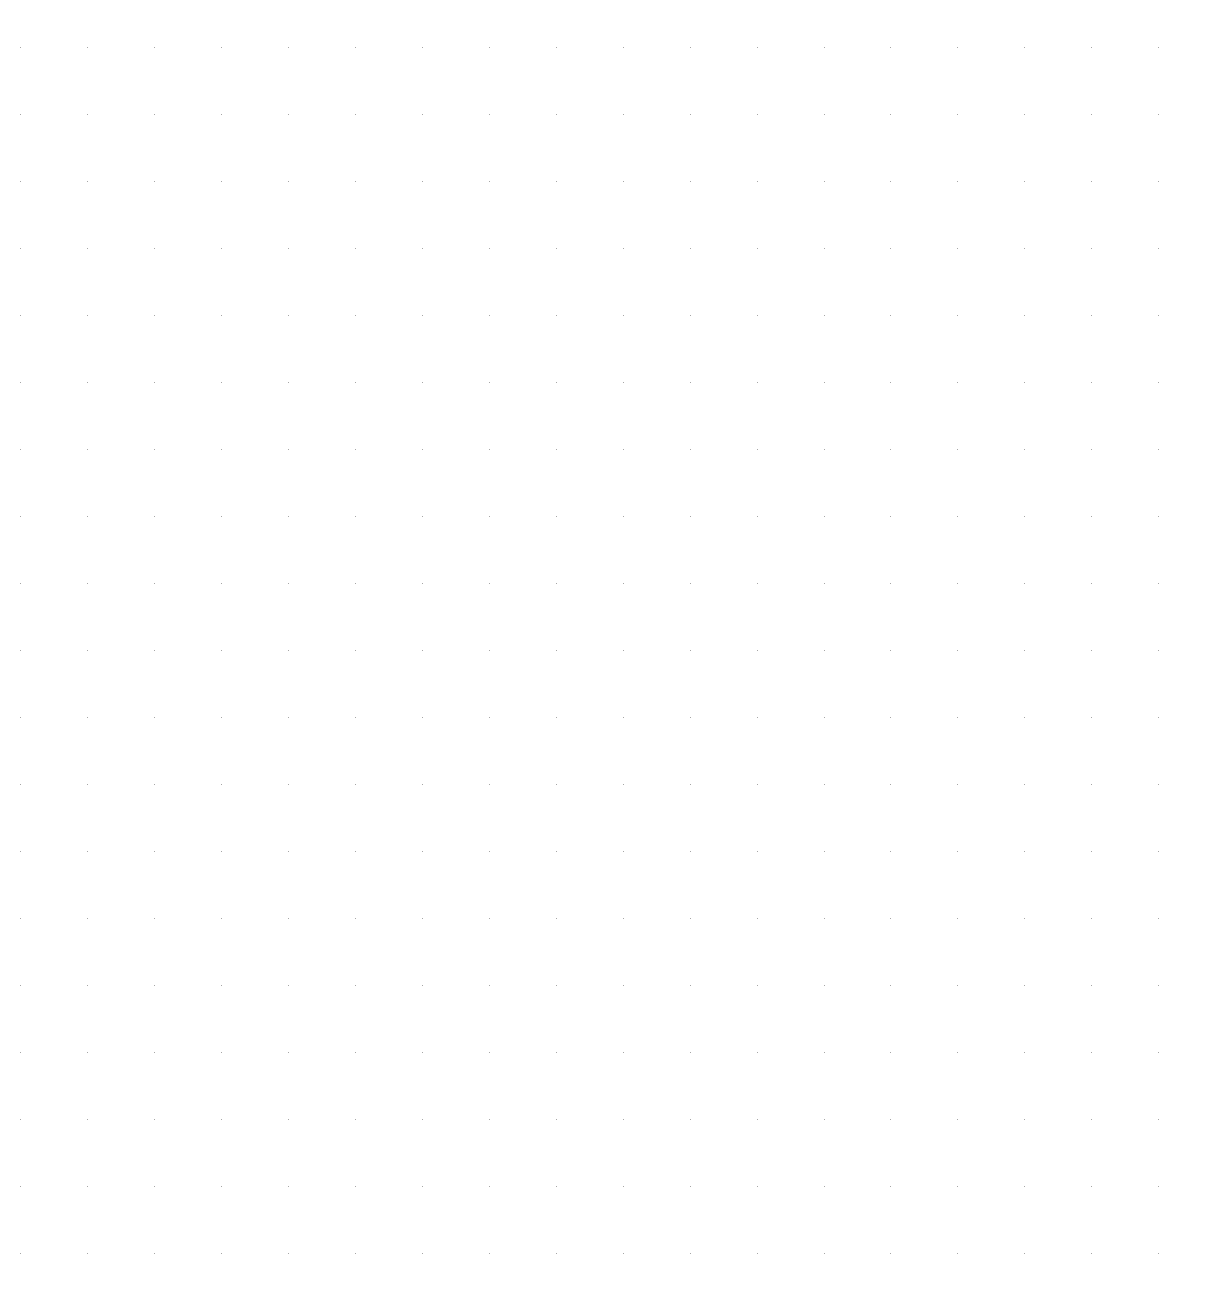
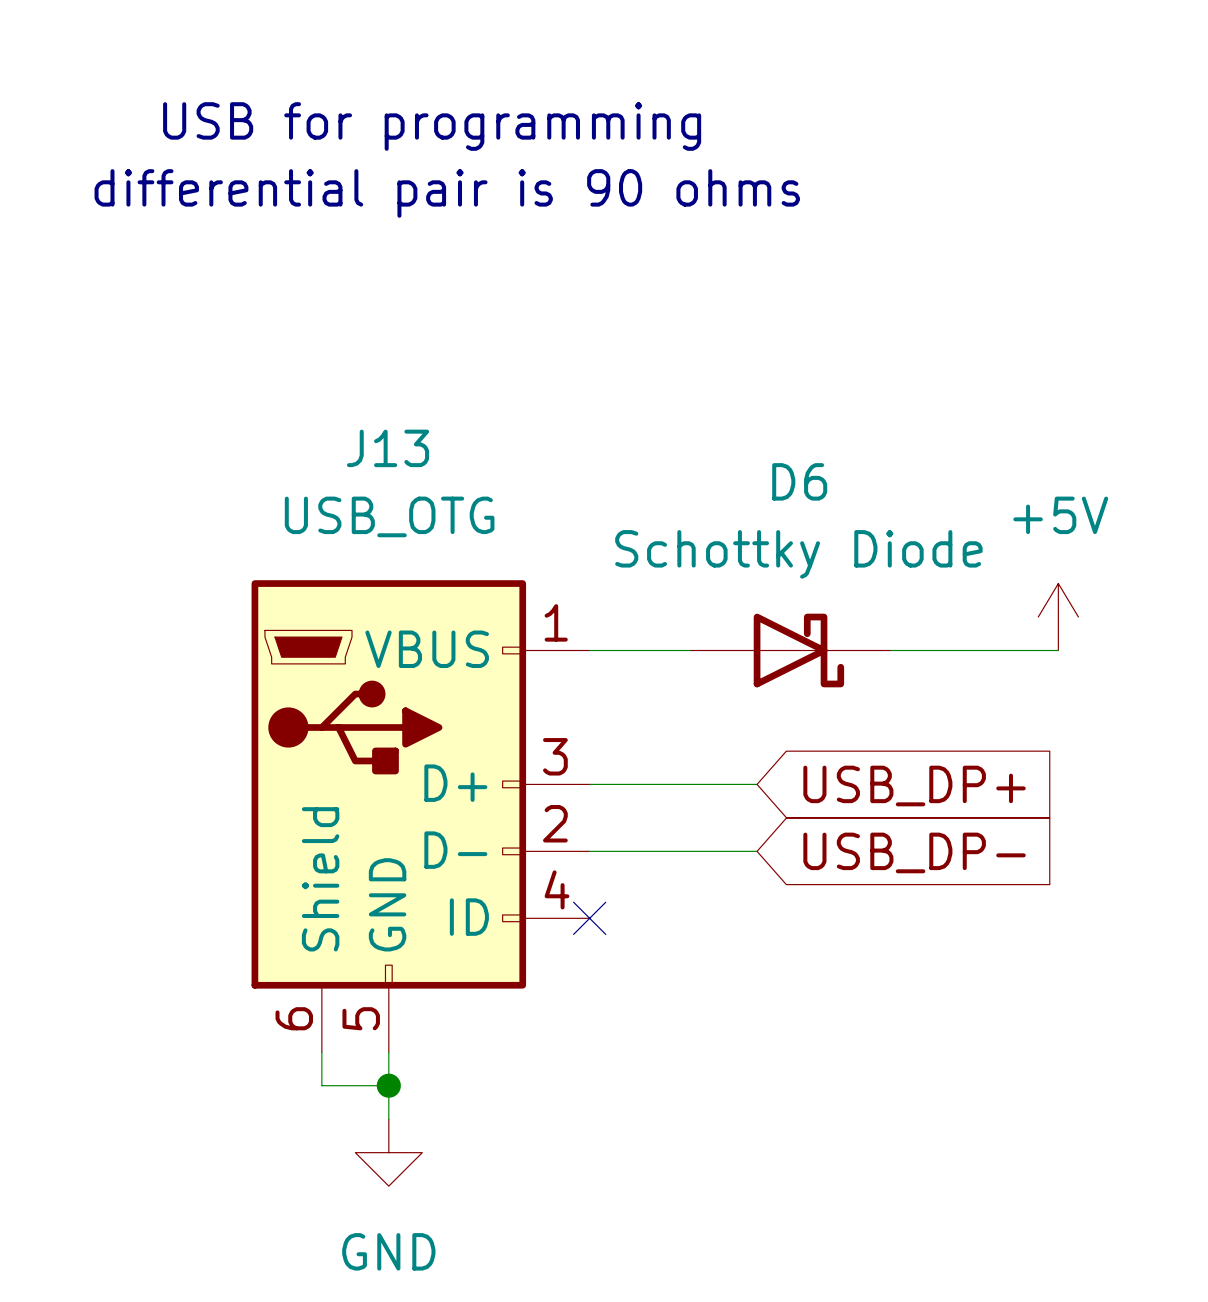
text: none -> USB for programming (432, 126)
text: none -> differential pair is 90 ohms (447, 193)
power symbol: none -> +5V (1058, 617)
wire: none -> (589, 650) (690, 650)
D6: none -> Schottky Diode (790, 650)
wire: none -> (890, 650) (1058, 650)
wire: none -> (589, 784) (757, 784)
global label: none -> USB_DP+ (914, 786)
J13: none -> USB_OTG (420, 816)
wire: none -> (589, 851) (757, 851)
global label: none -> USB_DP- (914, 852)
no-connect mark: none -> (589, 918)
wire: none -> (321, 1052) (321, 1085) (388, 1085)
wire: none -> (388, 1052) (388, 1119)
junction: none -> (388, 1085)
power symbol: none -> GND (388, 1152)

